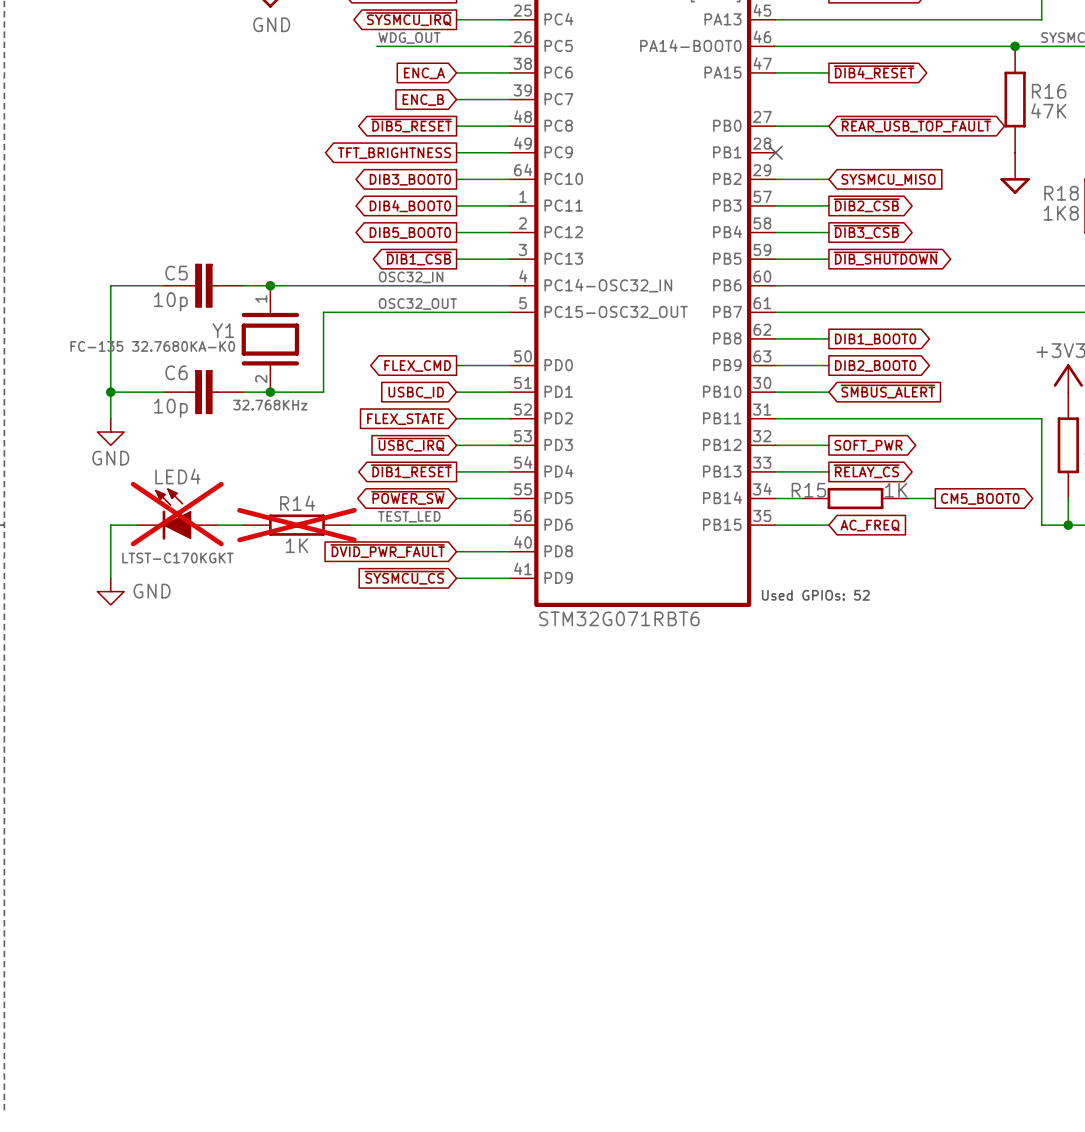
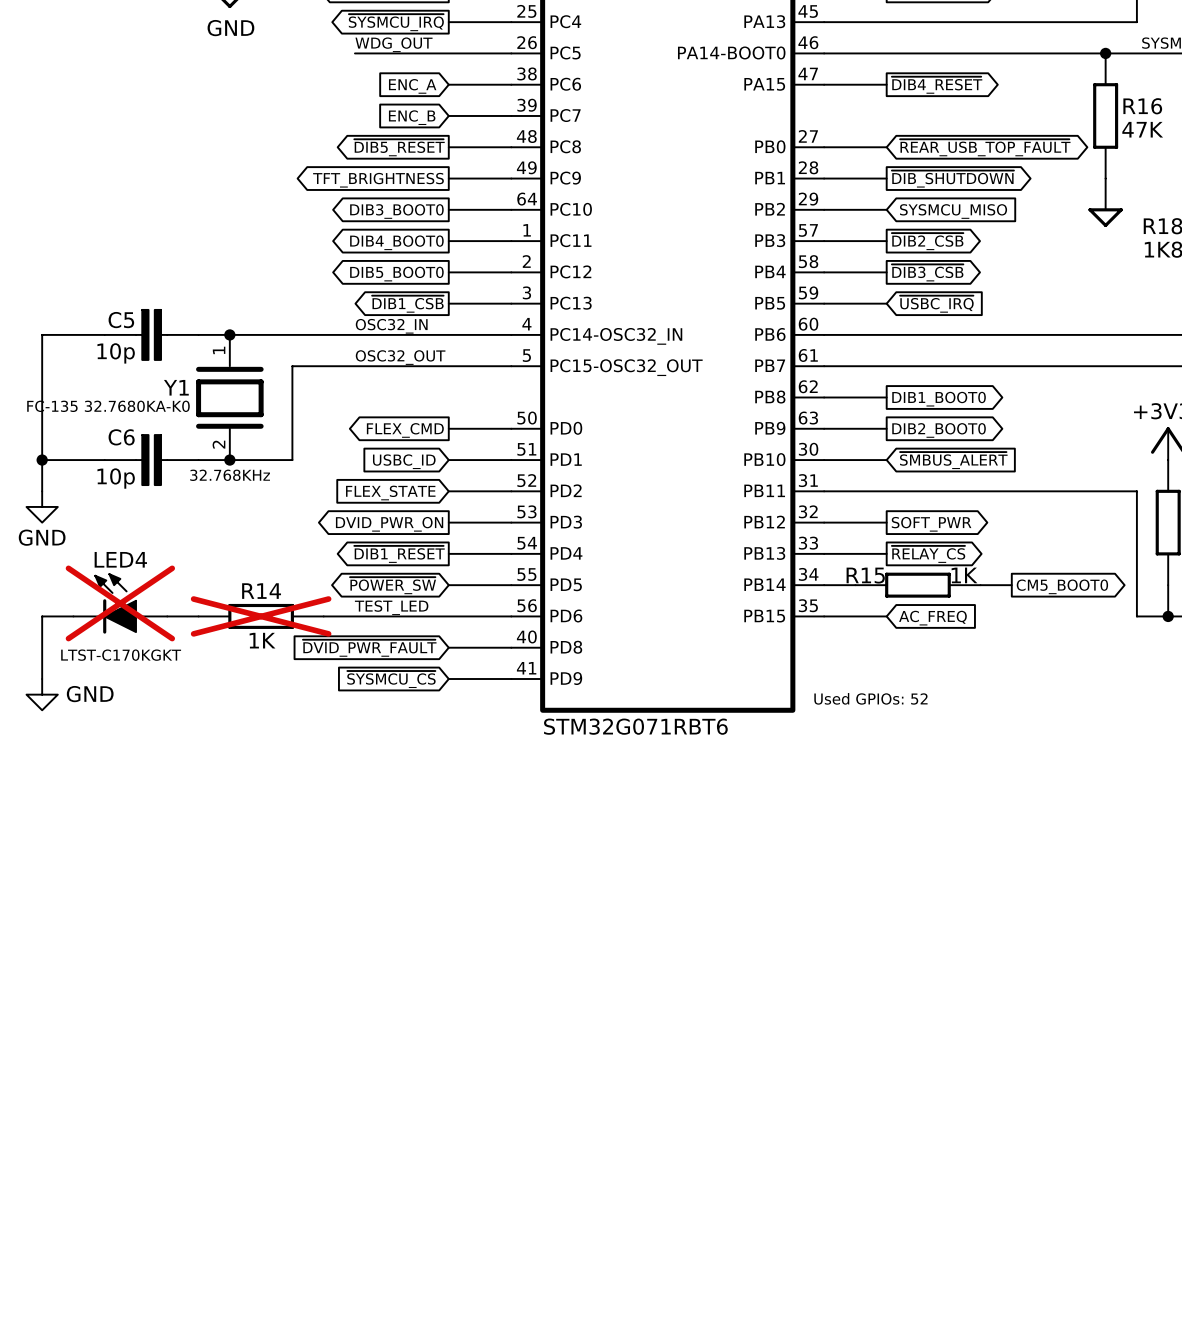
wire: none -> (824, 178) (886, 178)
no-connect mark: (775, 152) -> none
global label: none -> ~{DIB_SHUTDOWN} (952, 179)
global label shape: output (885, 258) -> input (936, 304)
global label: ~{DIB_SHUTDOWN} (885, 258) -> ~{USBC_IRQ} (936, 304)
global label shape: input (411, 444) -> output (389, 524)
global label: ~{USBC_IRQ} (411, 444) -> DVID_PWR_ON (389, 524)

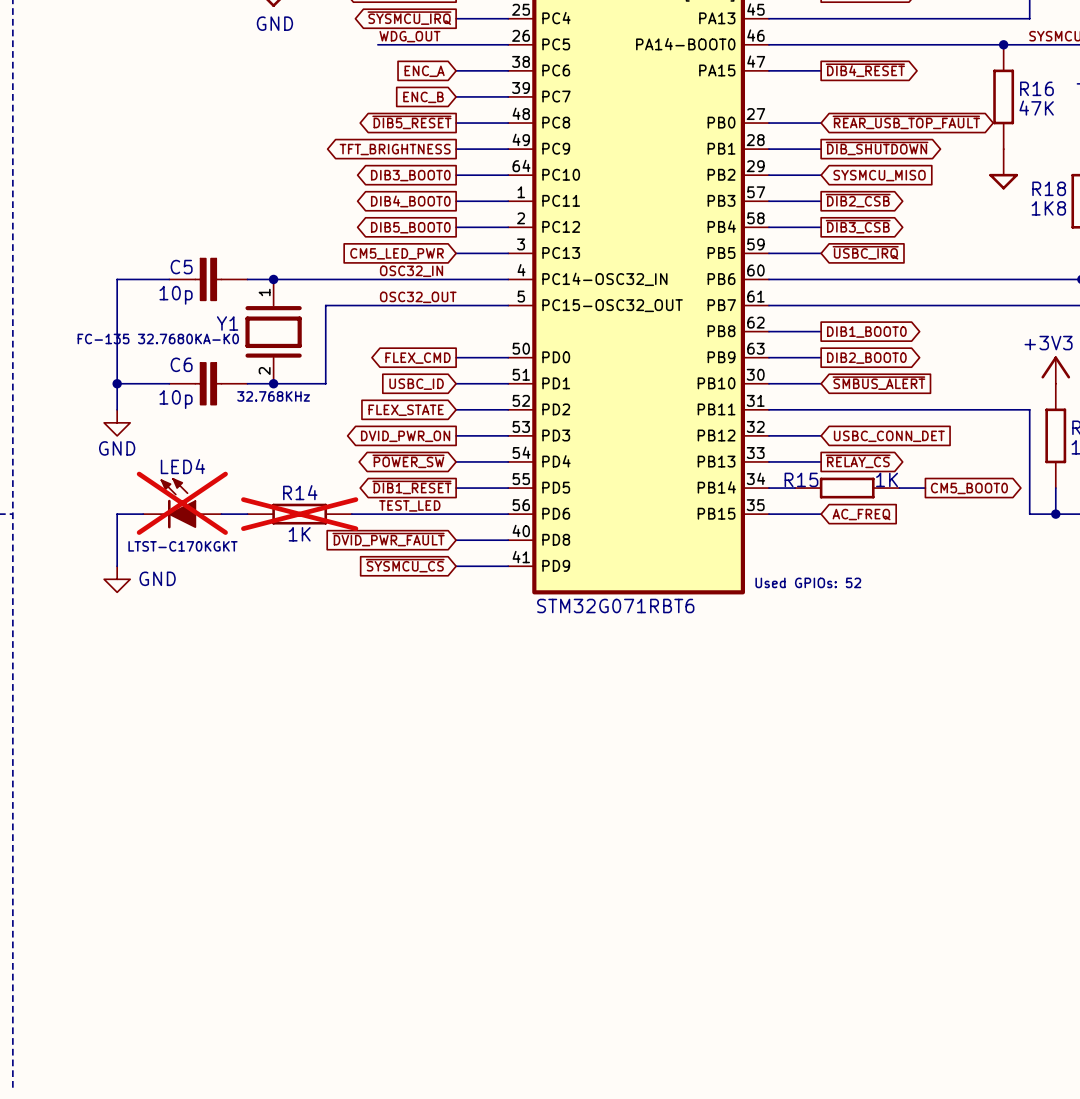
global label shape: output (407, 304) -> input (397, 253)
global label: ~{DIB1_CSB} (407, 304) -> CM5_LED_PWR (397, 253)
global label shape: output (931, 524) -> input (889, 436)
global label: SOFT_PWR (931, 524) -> USBC_CONN_DET (889, 436)
global label shape: output (399, 554) -> bidirectional (408, 461)
global label: ~{DIB1_RESET} (399, 554) -> ~{POWER_SW} (408, 461)
global label shape: bidirectional (393, 585) -> output (411, 487)
global label: ~{POWER_SW} (393, 585) -> ~{DIB1_RESET} (411, 487)

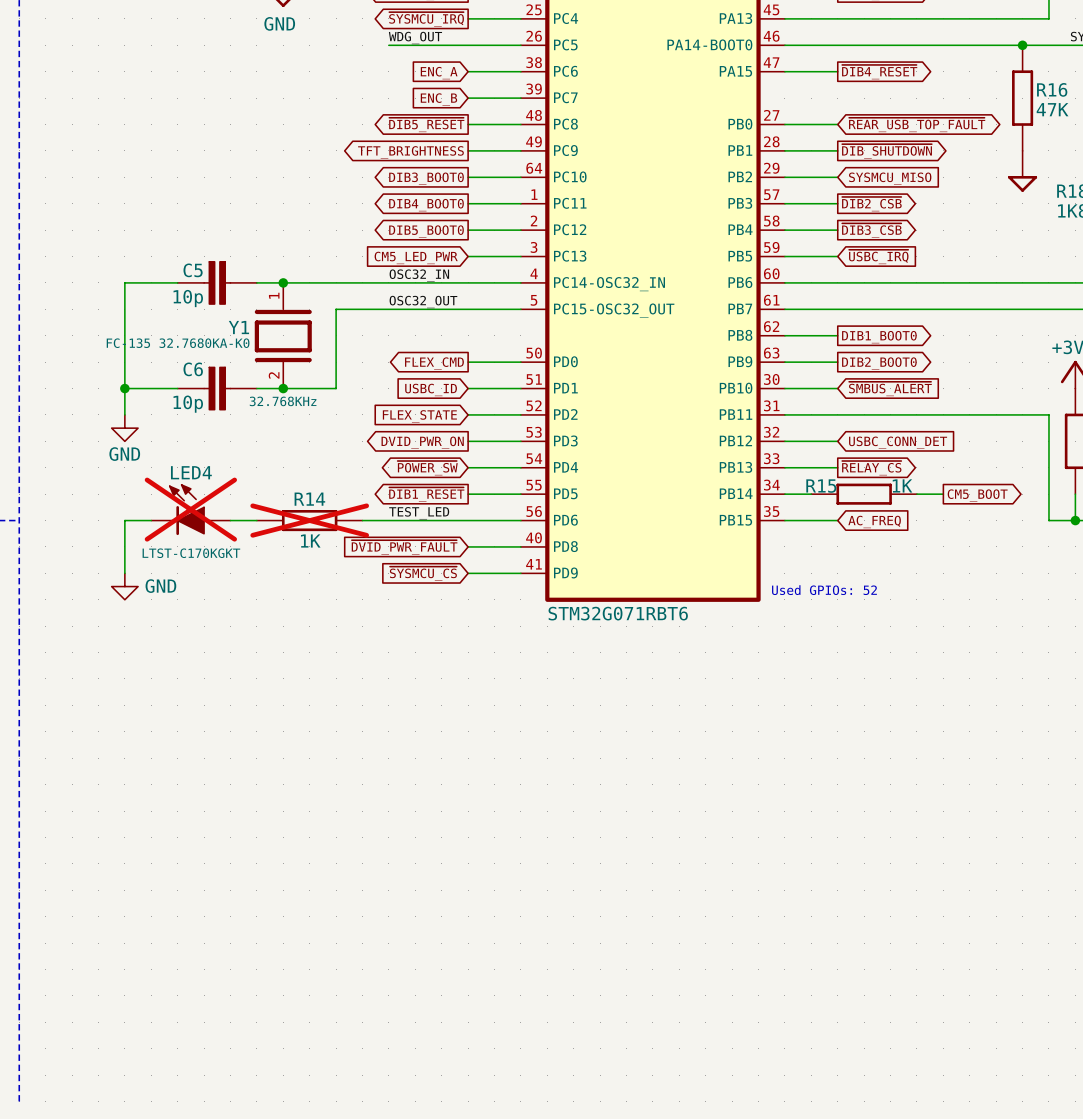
global label: CM5_BOOT0 (969, 488) -> CM5_BOOT (977, 495)

